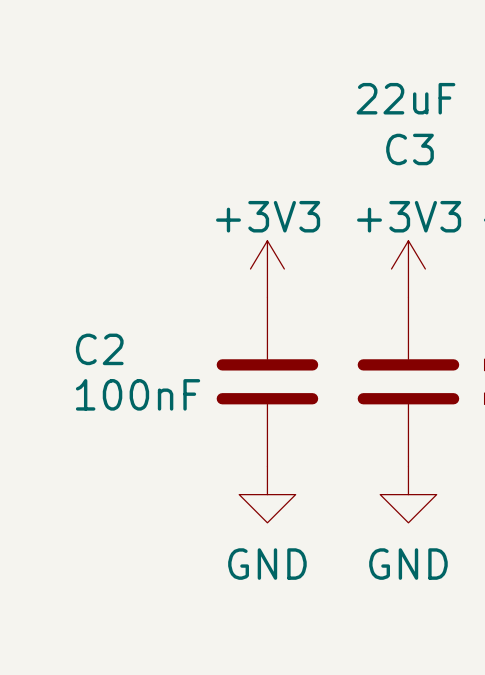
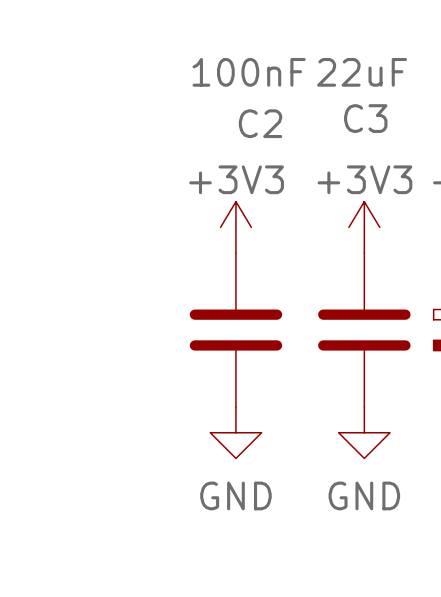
C2 name position: C2 (99, 349) -> C2 (260, 123)
C2 value position: 100nF (138, 394) -> 100nF (249, 72)

